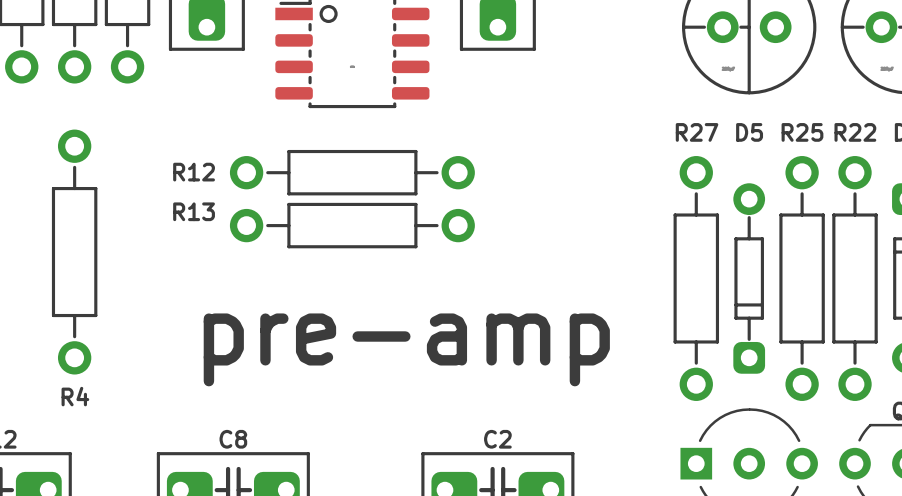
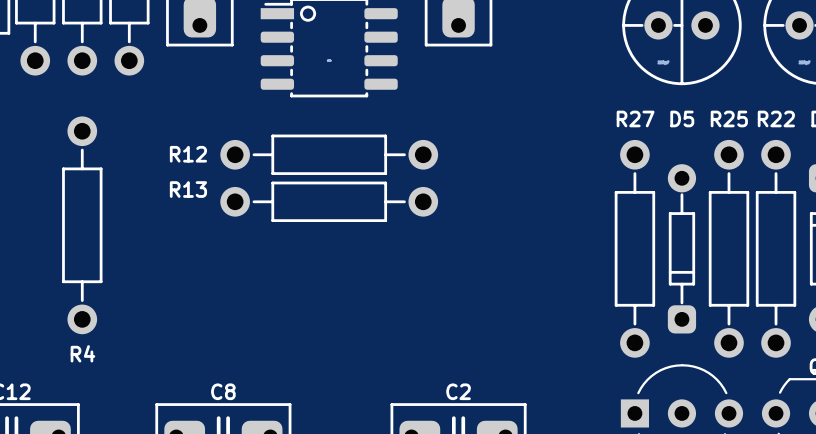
text: pre-amp (406, 349) -> none

